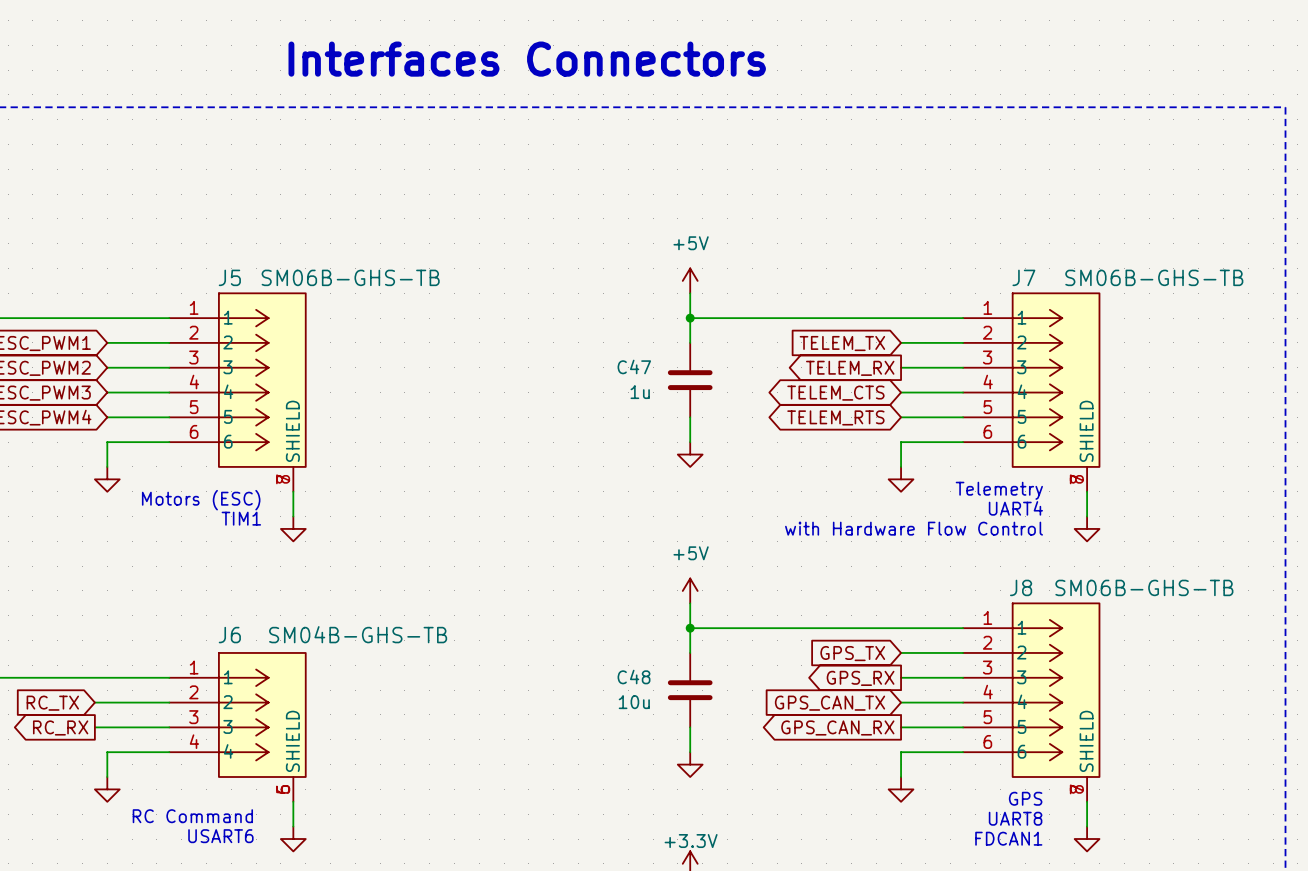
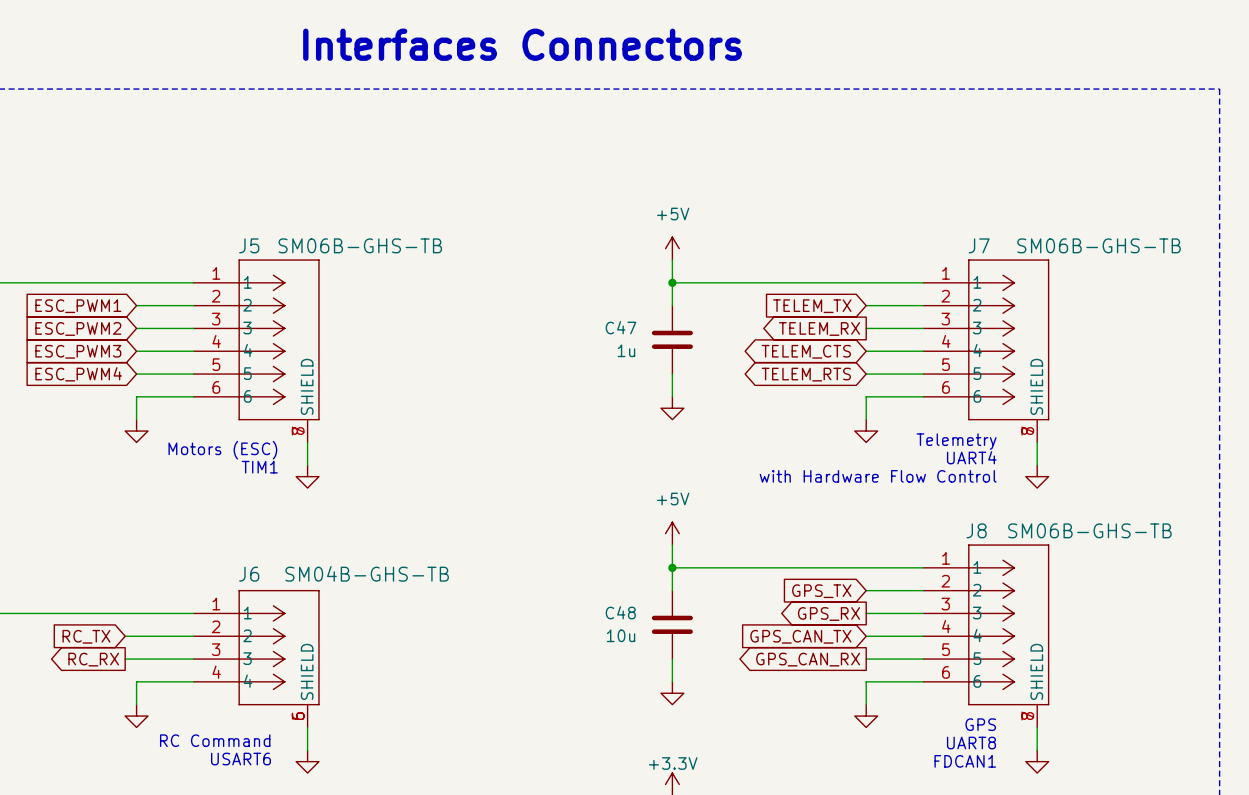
J5 symbol: [169, 293, 306, 492] -> [193, 259, 320, 443]
J7 symbol: [963, 293, 1100, 492] -> [923, 259, 1050, 443]
J8 symbol: [963, 603, 1100, 802] -> [923, 544, 1050, 728]
J6 symbol: [169, 652, 306, 802] -> [193, 590, 320, 728]

